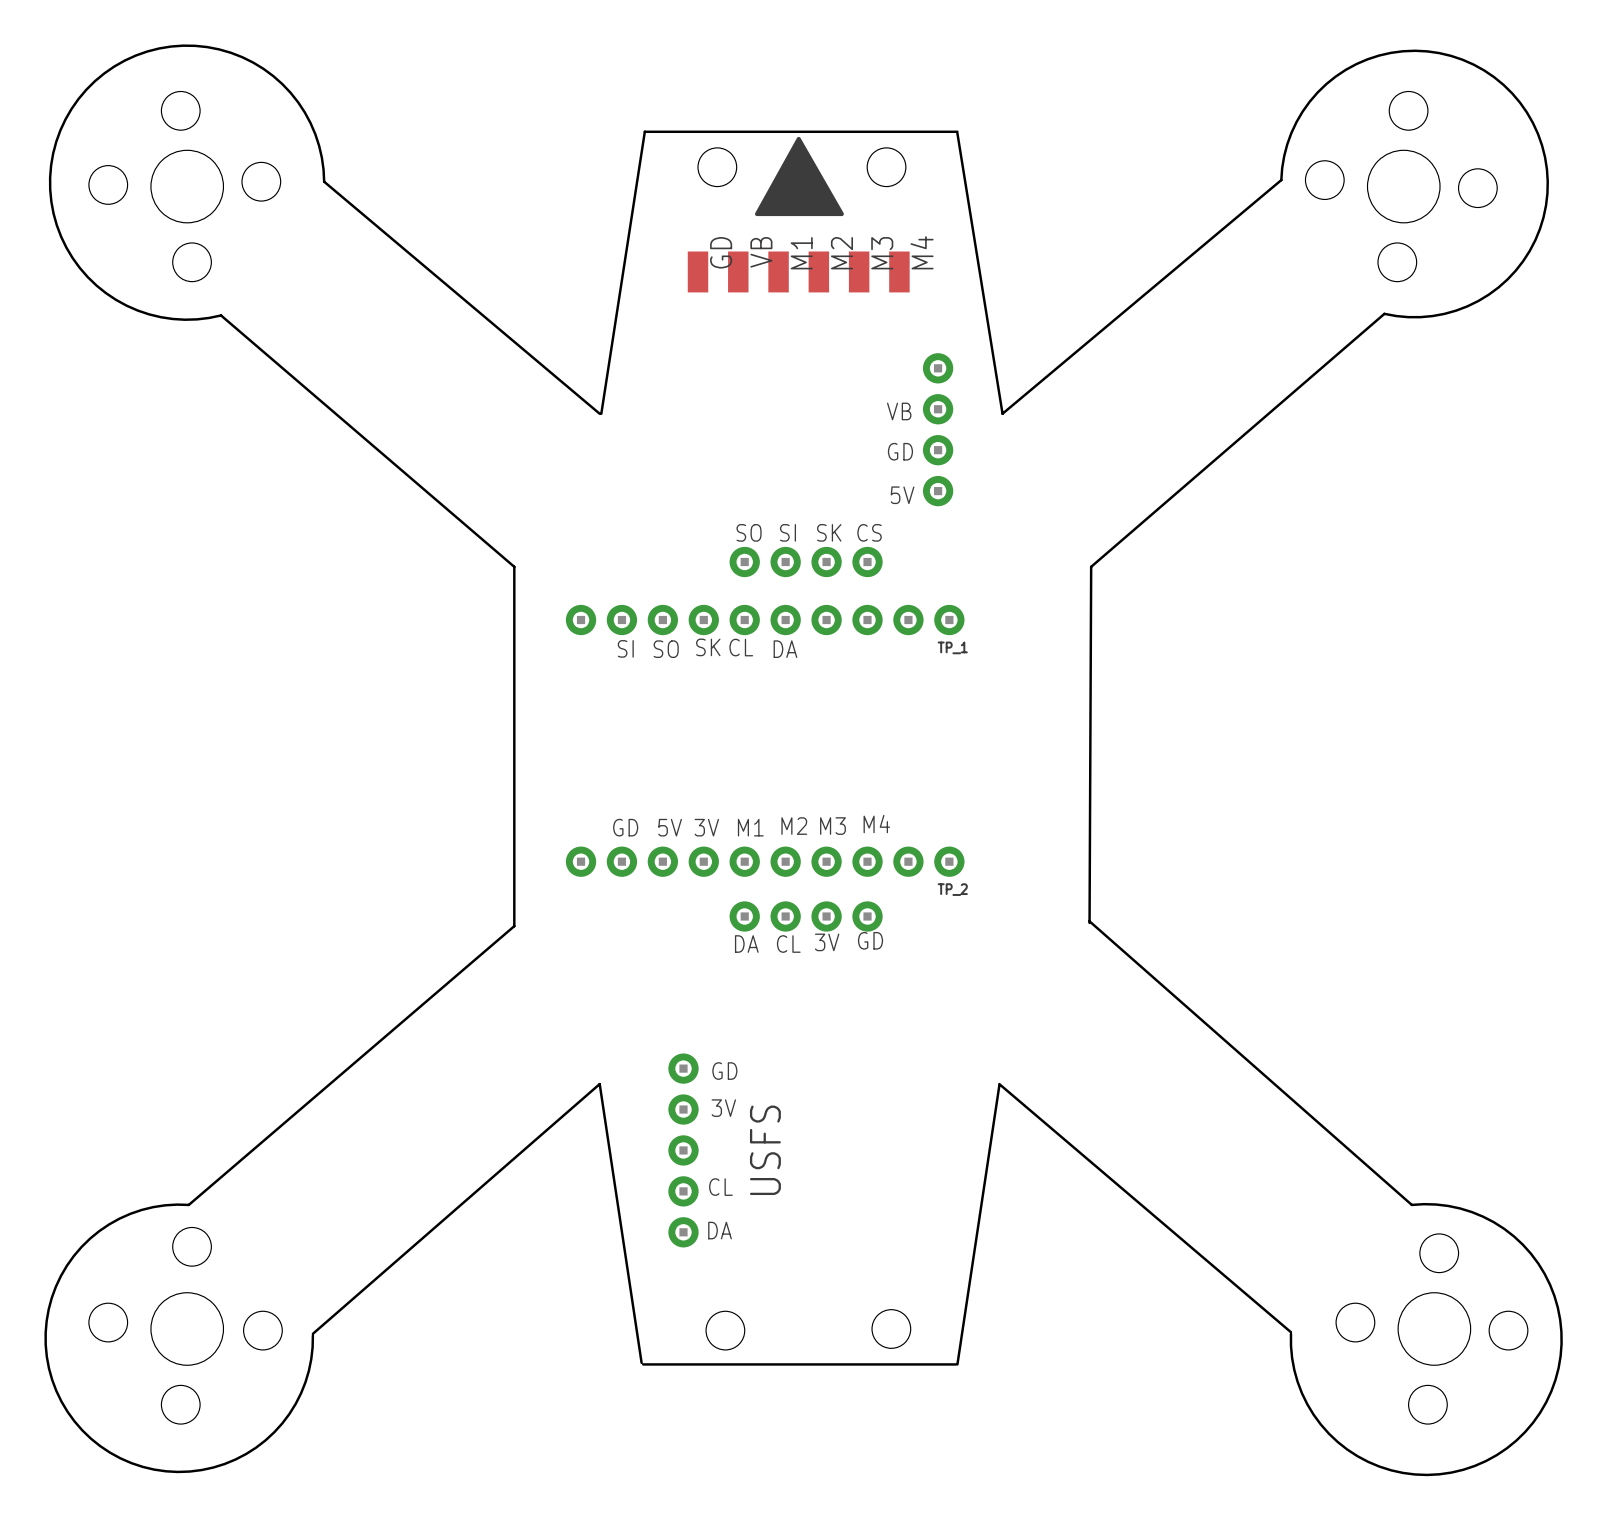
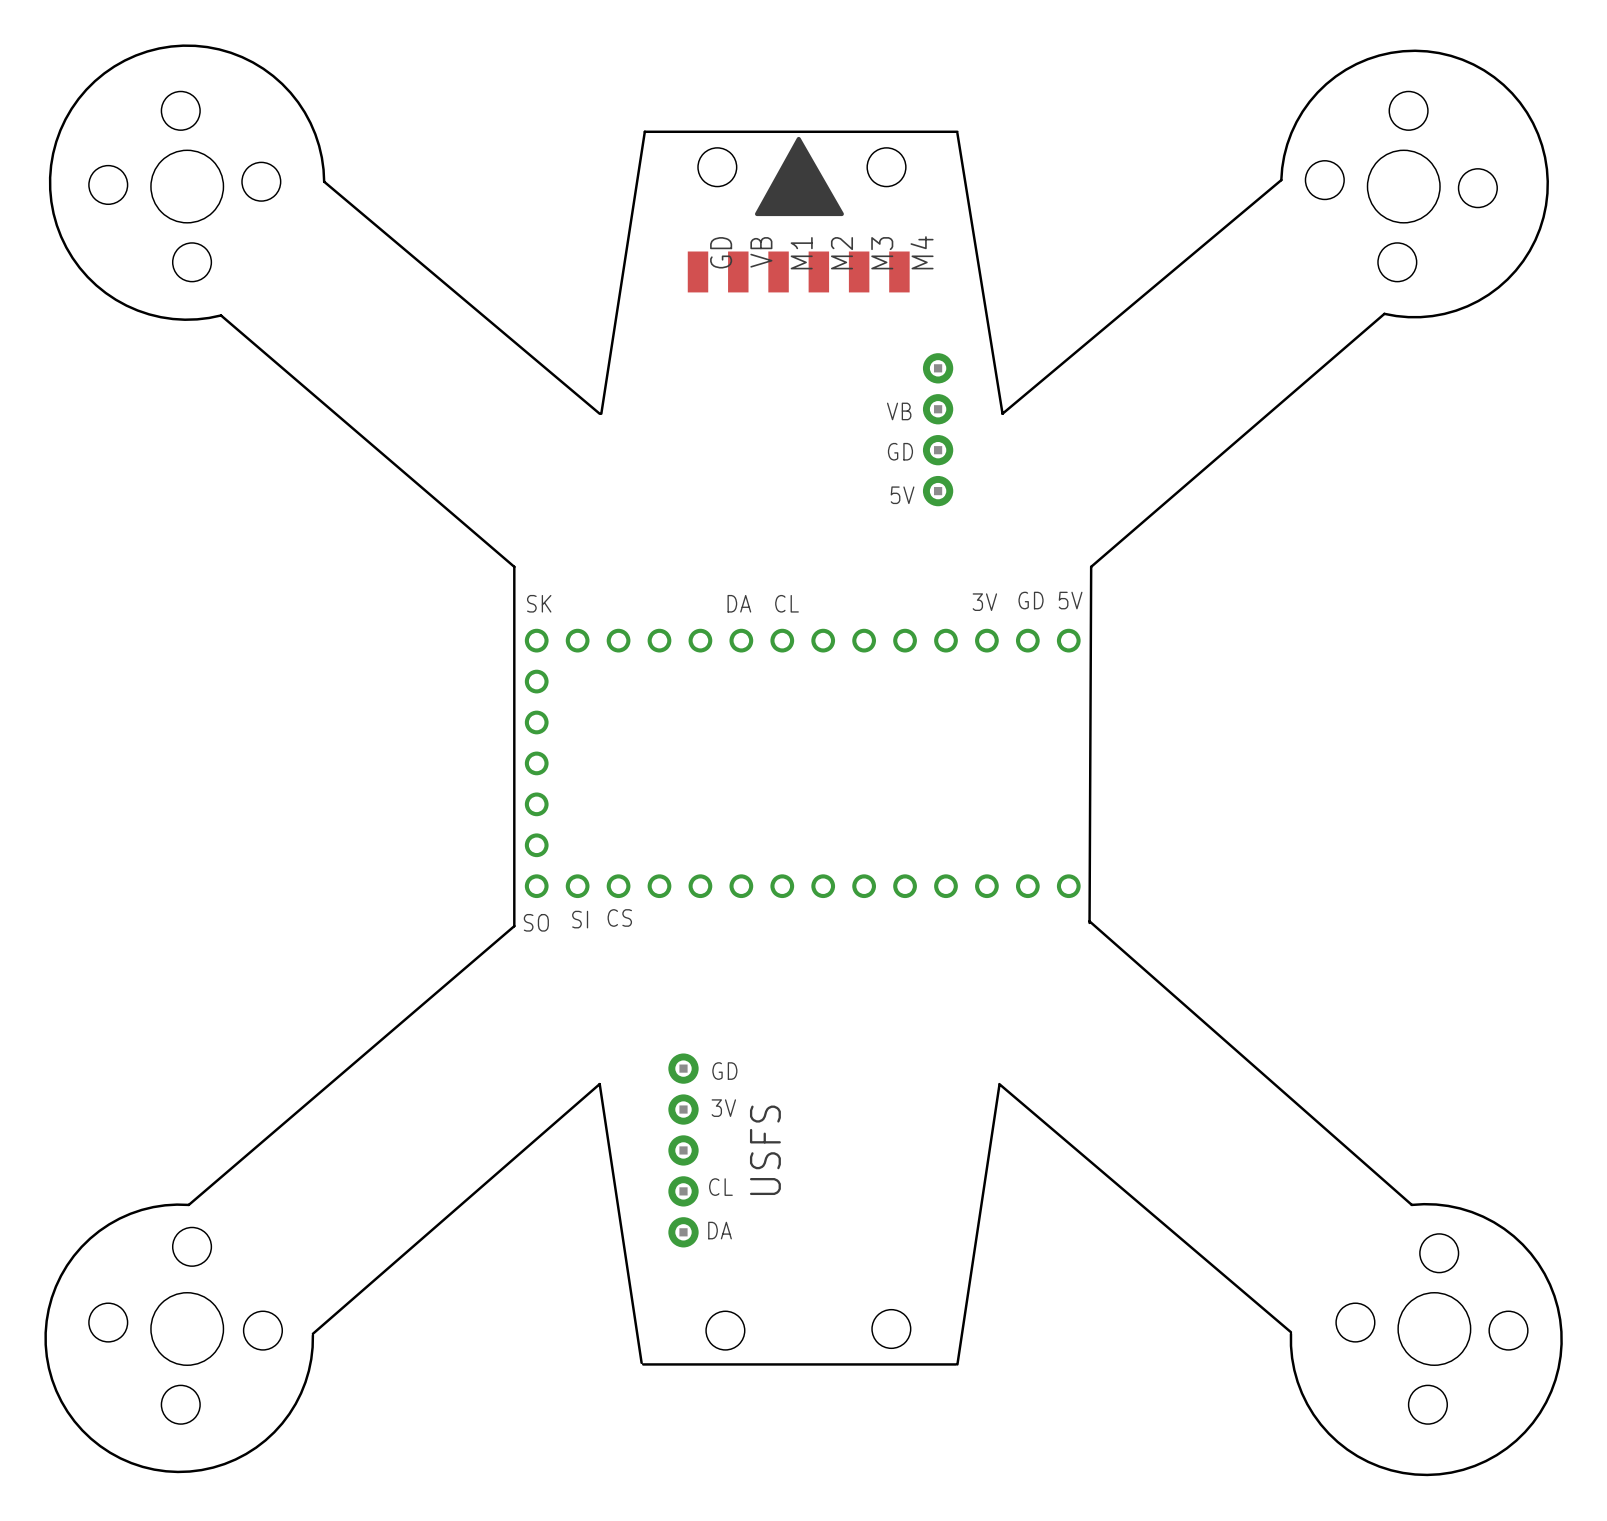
text: SO (749, 532) -> none
text: SI (787, 532) -> none
text: SK (829, 532) -> none
text: CS (869, 532) -> none
part: (806, 562) -> none
text: none -> GD (1031, 600)
text: none -> 5V (1070, 600)
text: none -> 3V (984, 602)
text: none -> SK (539, 603)
TP_1: (765, 620) -> none
text: SK (708, 647) -> none
text position: CL (741, 647) -> CL (787, 603)
text: SI (625, 648) -> none
text: SO (666, 649) -> none
text position: DA (785, 649) -> DA (739, 603)
part: none -> (802, 763)
text: M4 (876, 824) -> none
text: M2 (794, 826) -> none
text: M3 (832, 826) -> none
text: GD (625, 827) -> none
text: 5V (670, 827) -> none
text: 3V (706, 827) -> none
text: M1 (750, 827) -> none
TP_2: (765, 861) -> none
part: (806, 916) -> none
text: none -> CS (619, 917)
text: none -> SI (580, 919)
text: none -> SO (536, 922)
text: GD (870, 940) -> none
text: 3V (827, 942) -> none
text: DA (746, 944) -> none
text: CL (788, 944) -> none

